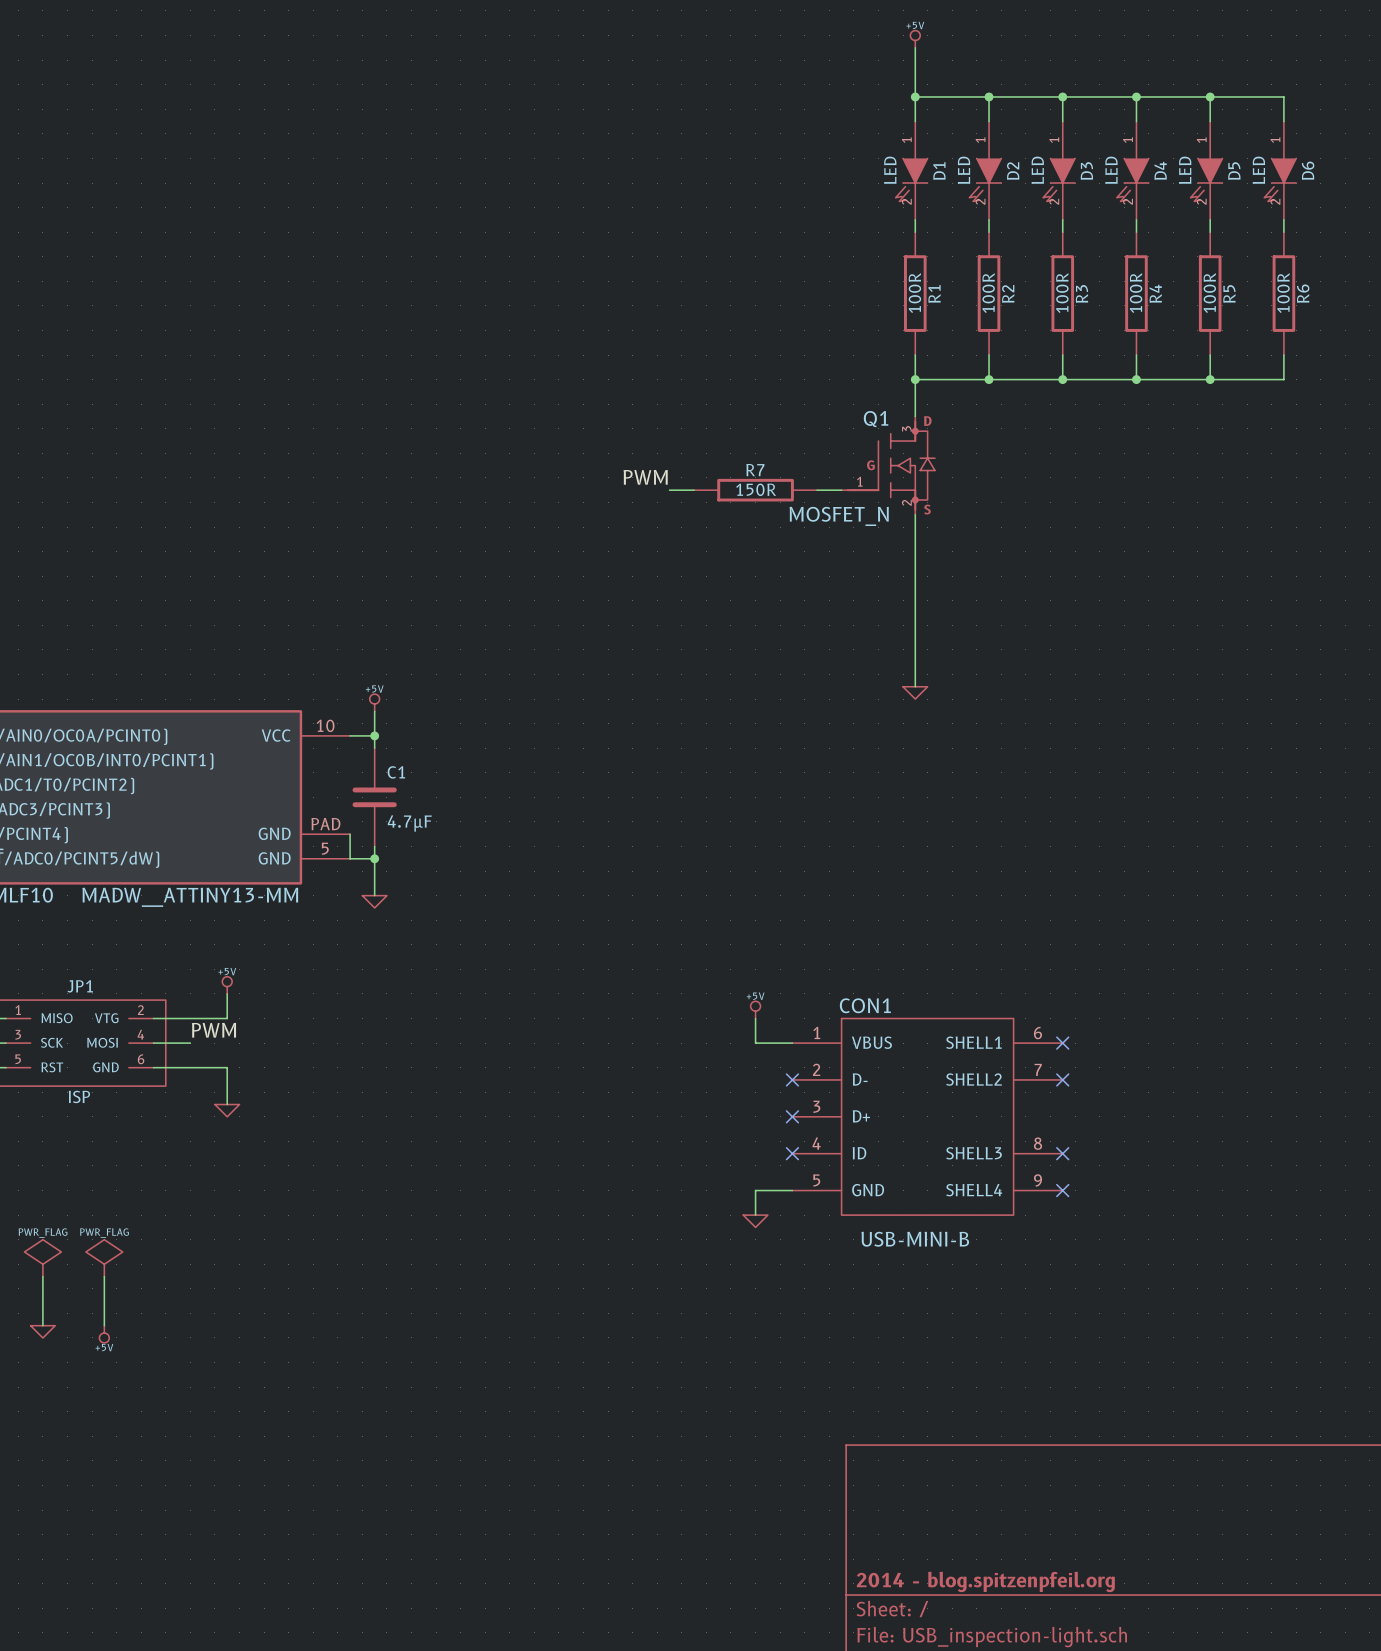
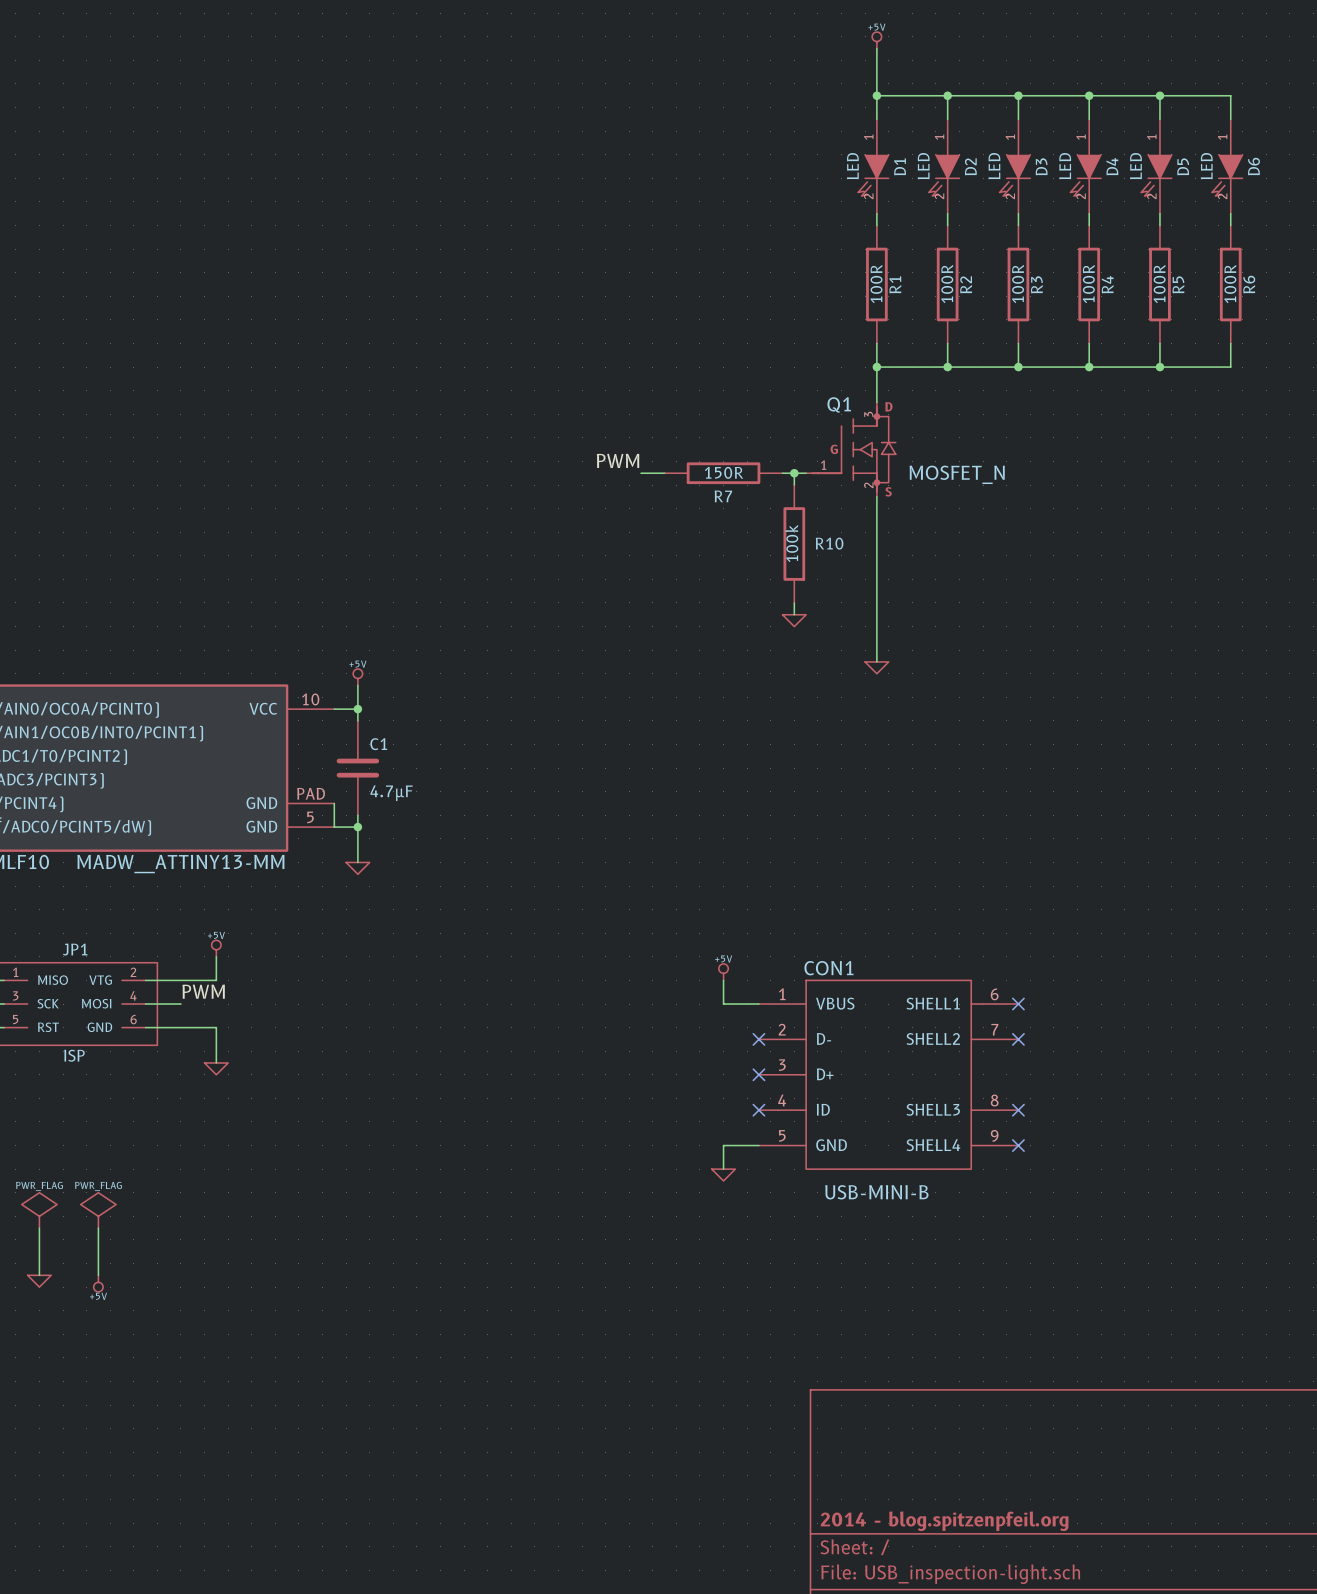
R7 name position: R7 (755, 470) -> R7 (723, 496)
wire: none -> (794, 473) (794, 485)
junction: none -> (794, 473)
Q1 value position: MOSFET_N (839, 516) -> MOSFET_N (957, 474)
R10: none -> 100k (794, 543)
wire: none -> (794, 602) (794, 614)
power symbol: none -> (794, 620)

